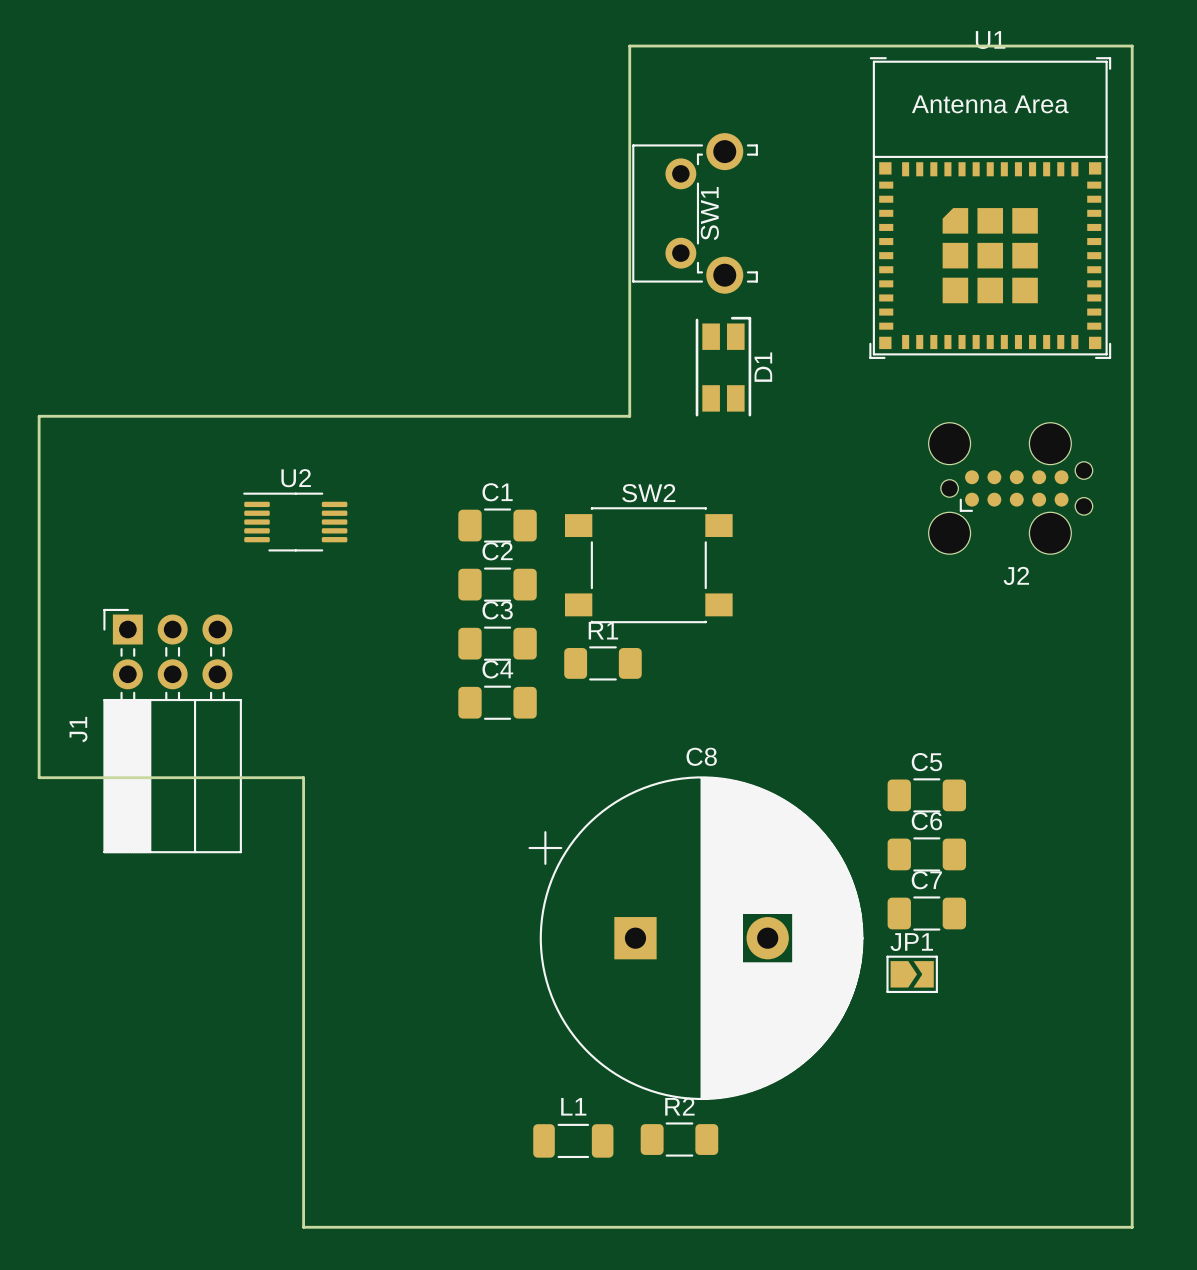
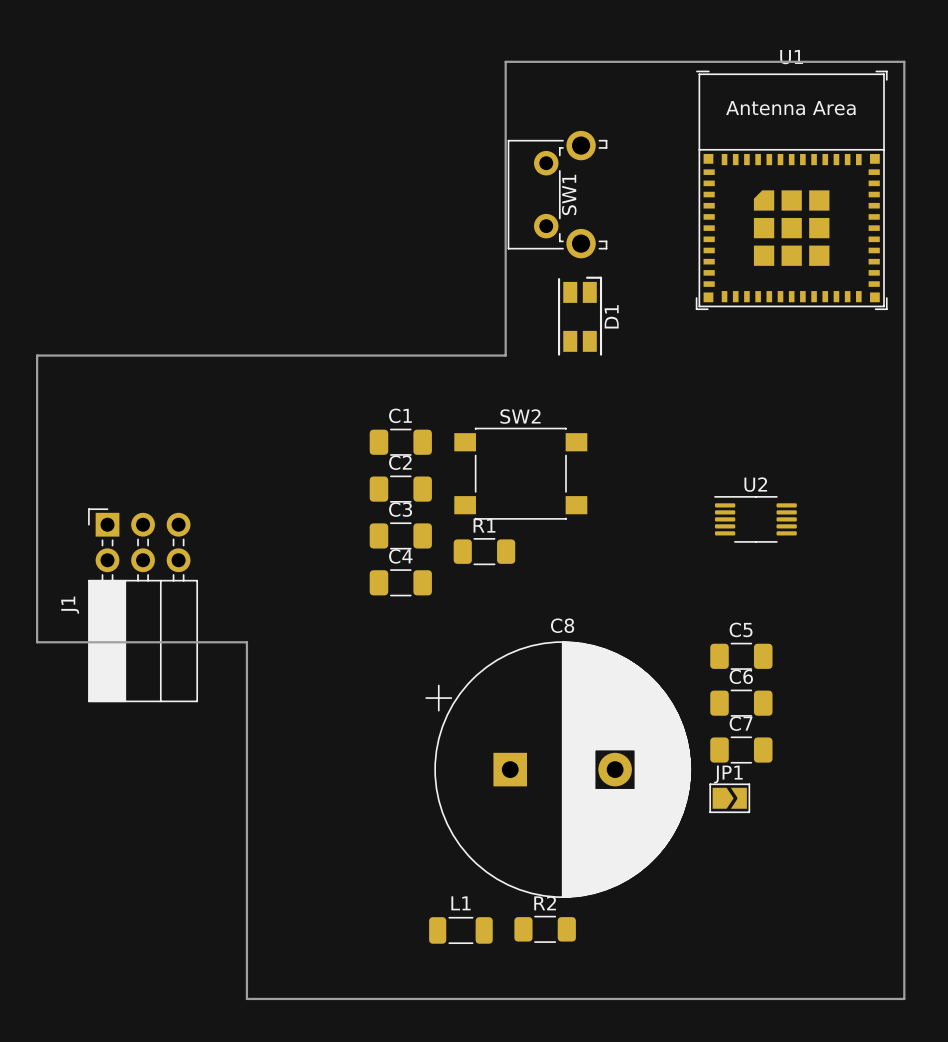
J2: (1010, 488) -> none
U2 position: (295, 522) -> (755, 519)

